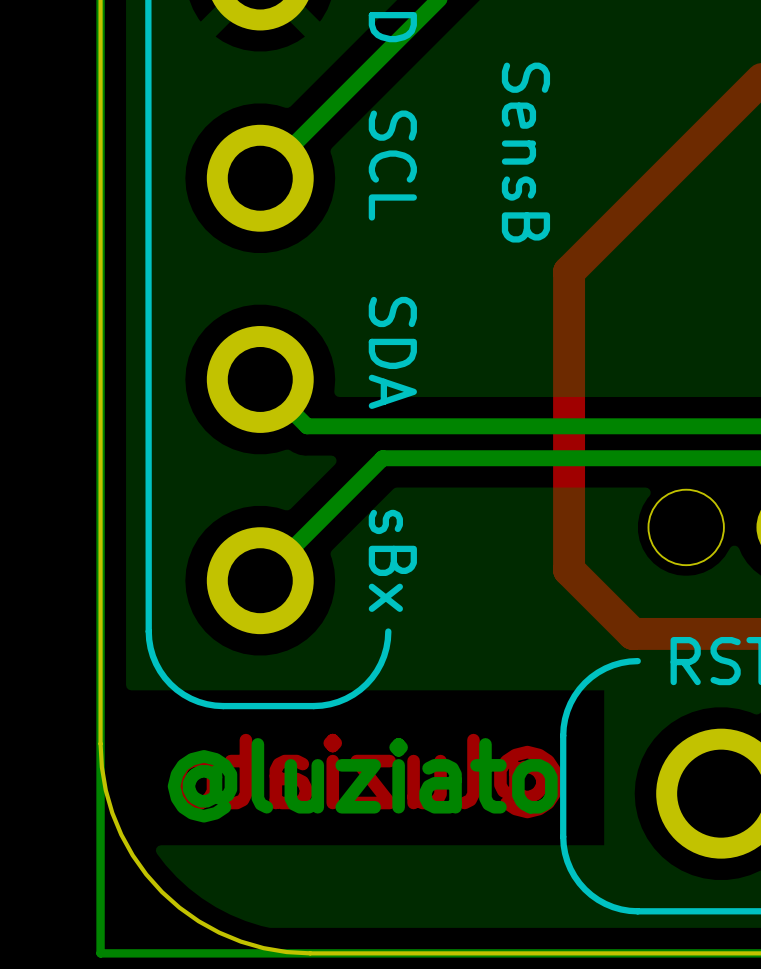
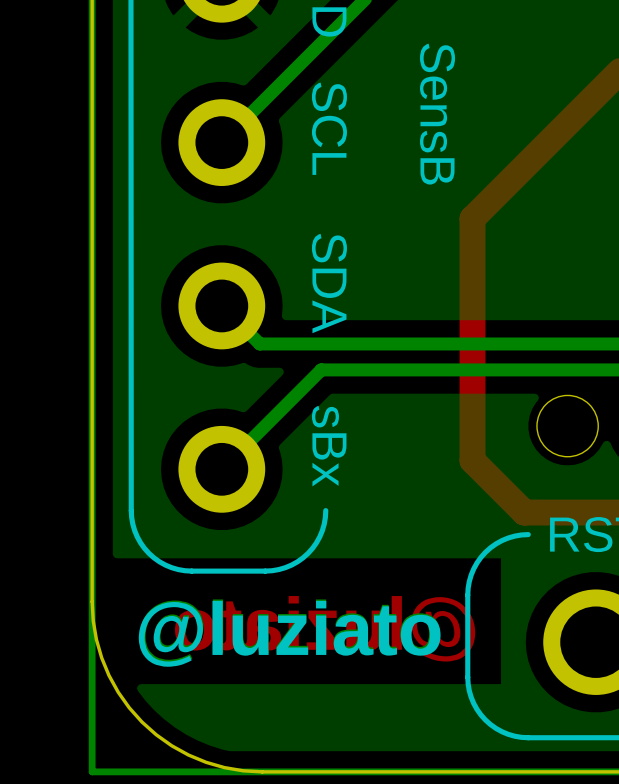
text: none -> @luziato (289, 633)

